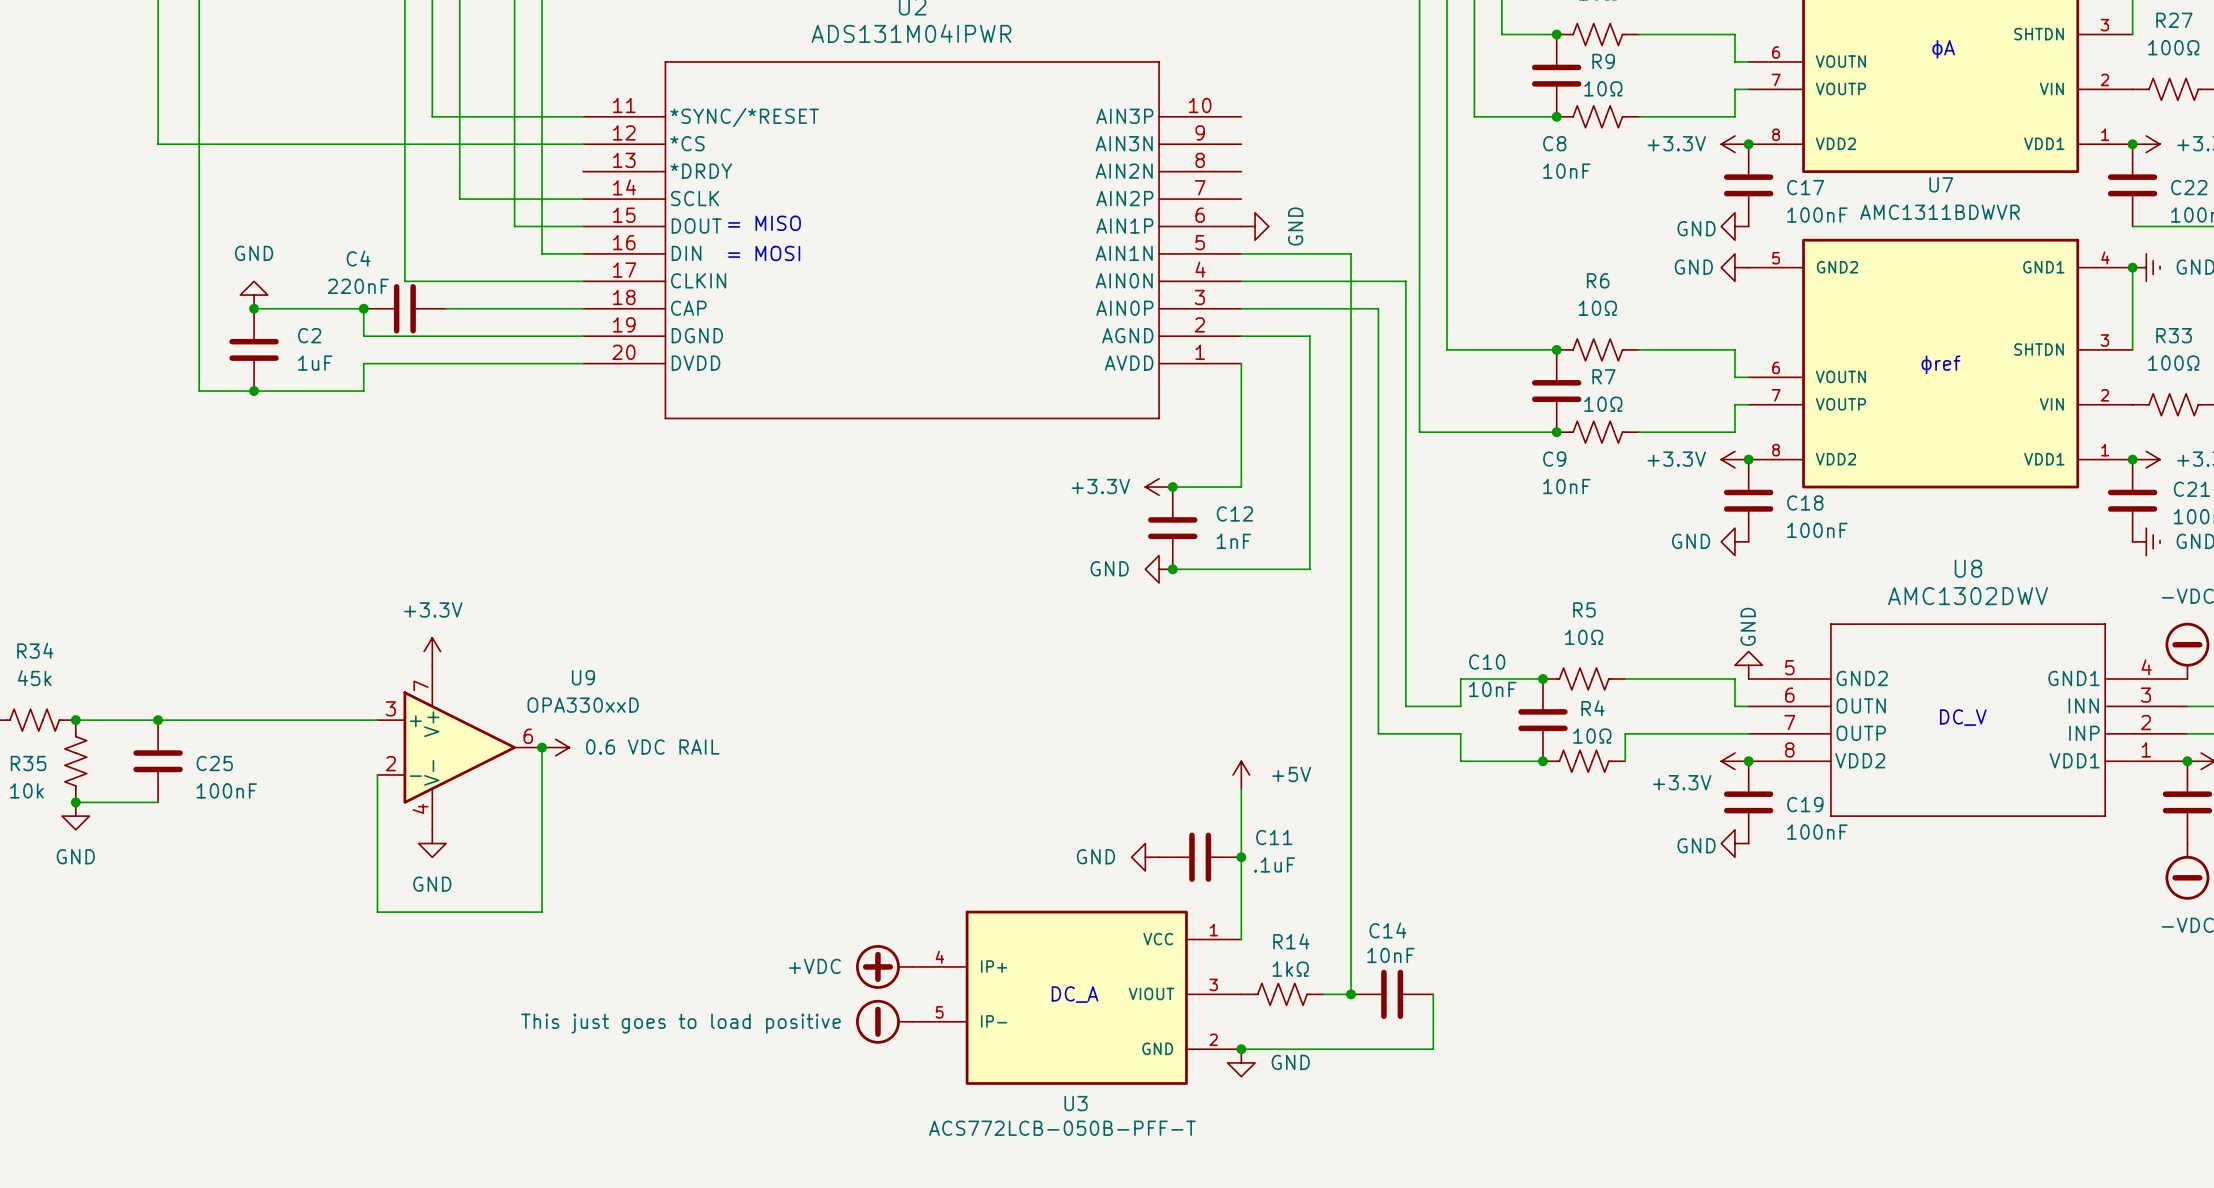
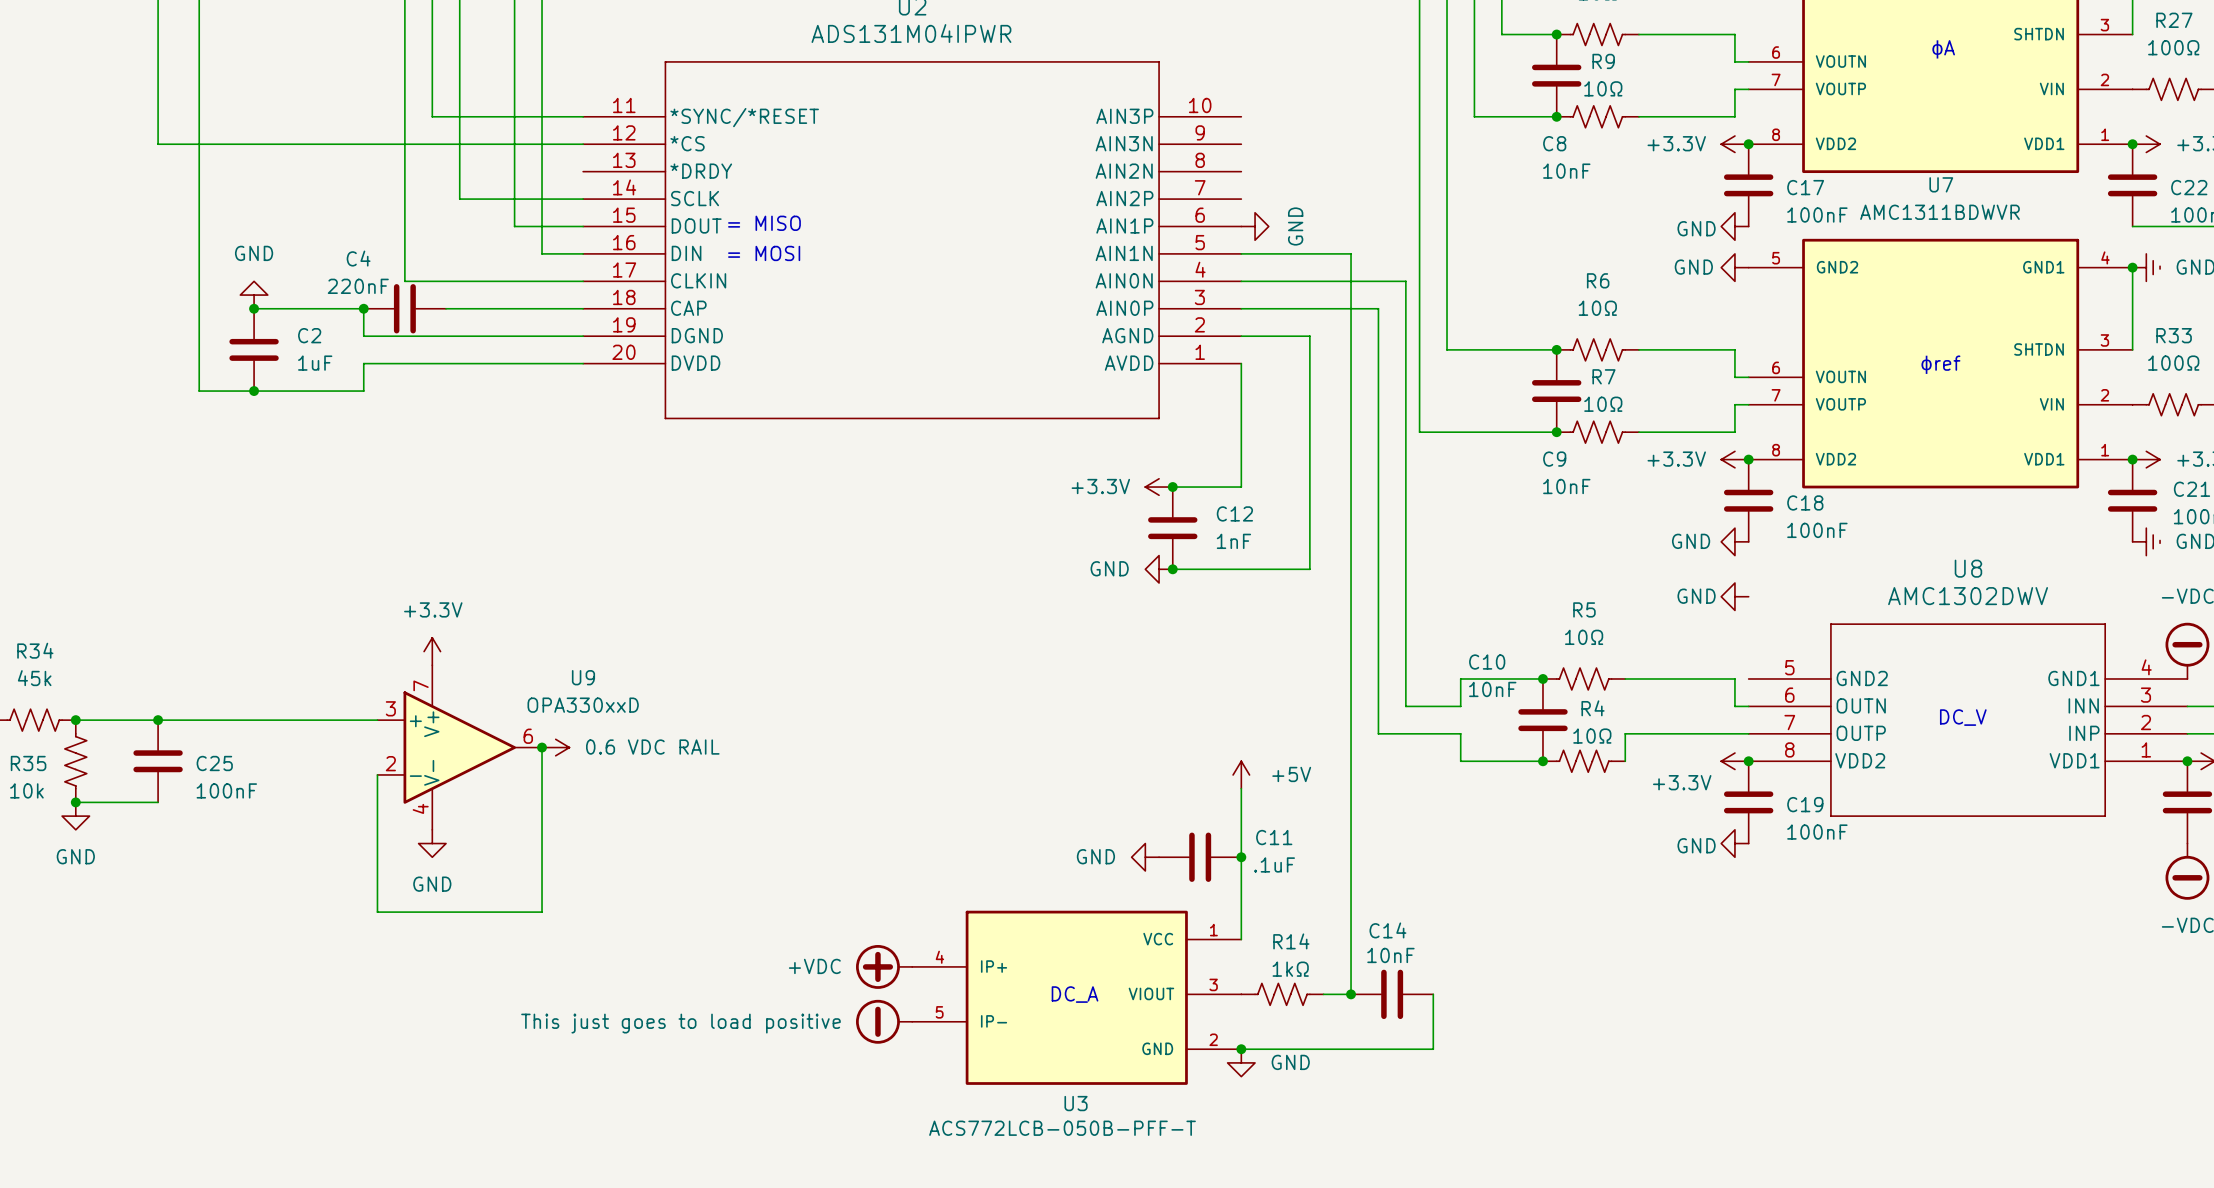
power symbol rotation: 0° (1748, 665) -> 90° counterclockwise (1734, 596)
power symbol position: GND (1748, 665) -> GND (1734, 596)

